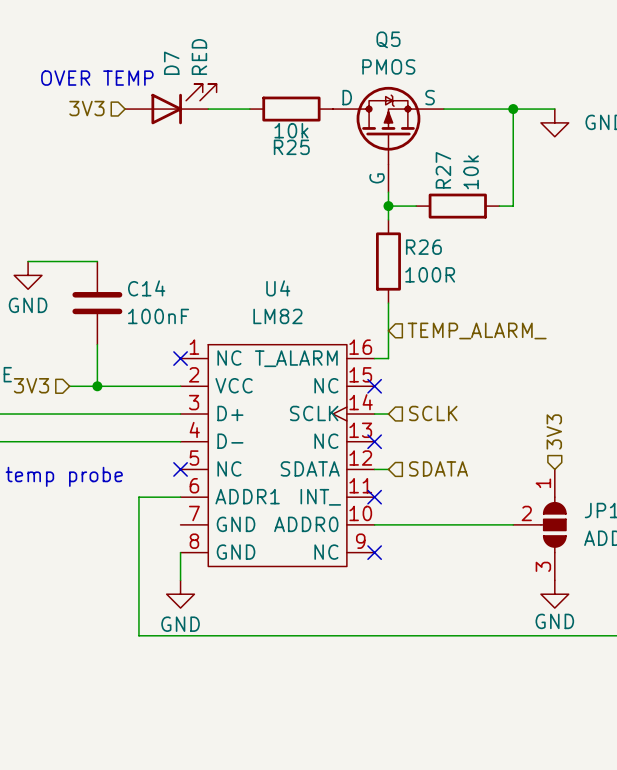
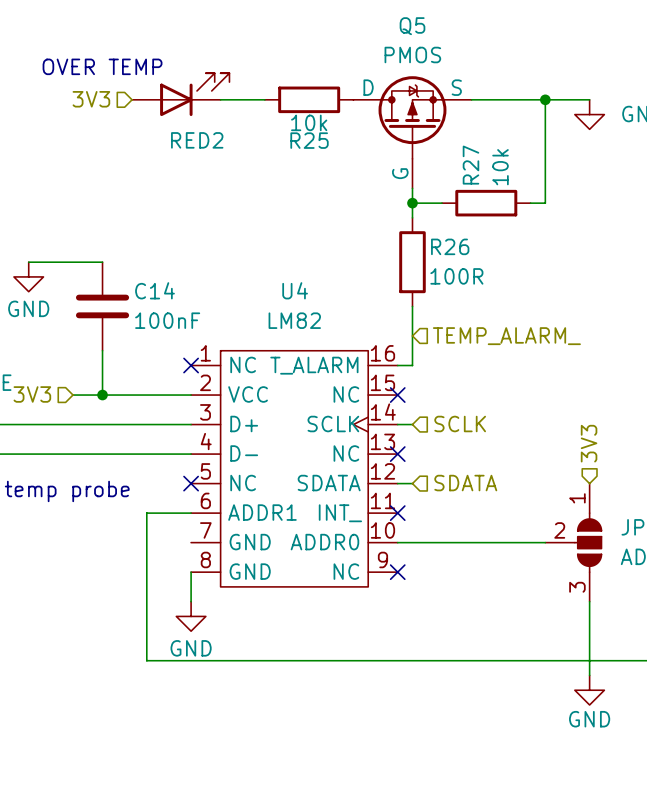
D7 value: RED (199, 56) -> none
D7 name: D7 (171, 63) -> RED2 (197, 140)
wire: none -> (589, 601) (589, 675)
power symbol position: GND (554, 594) -> GND (589, 690)

